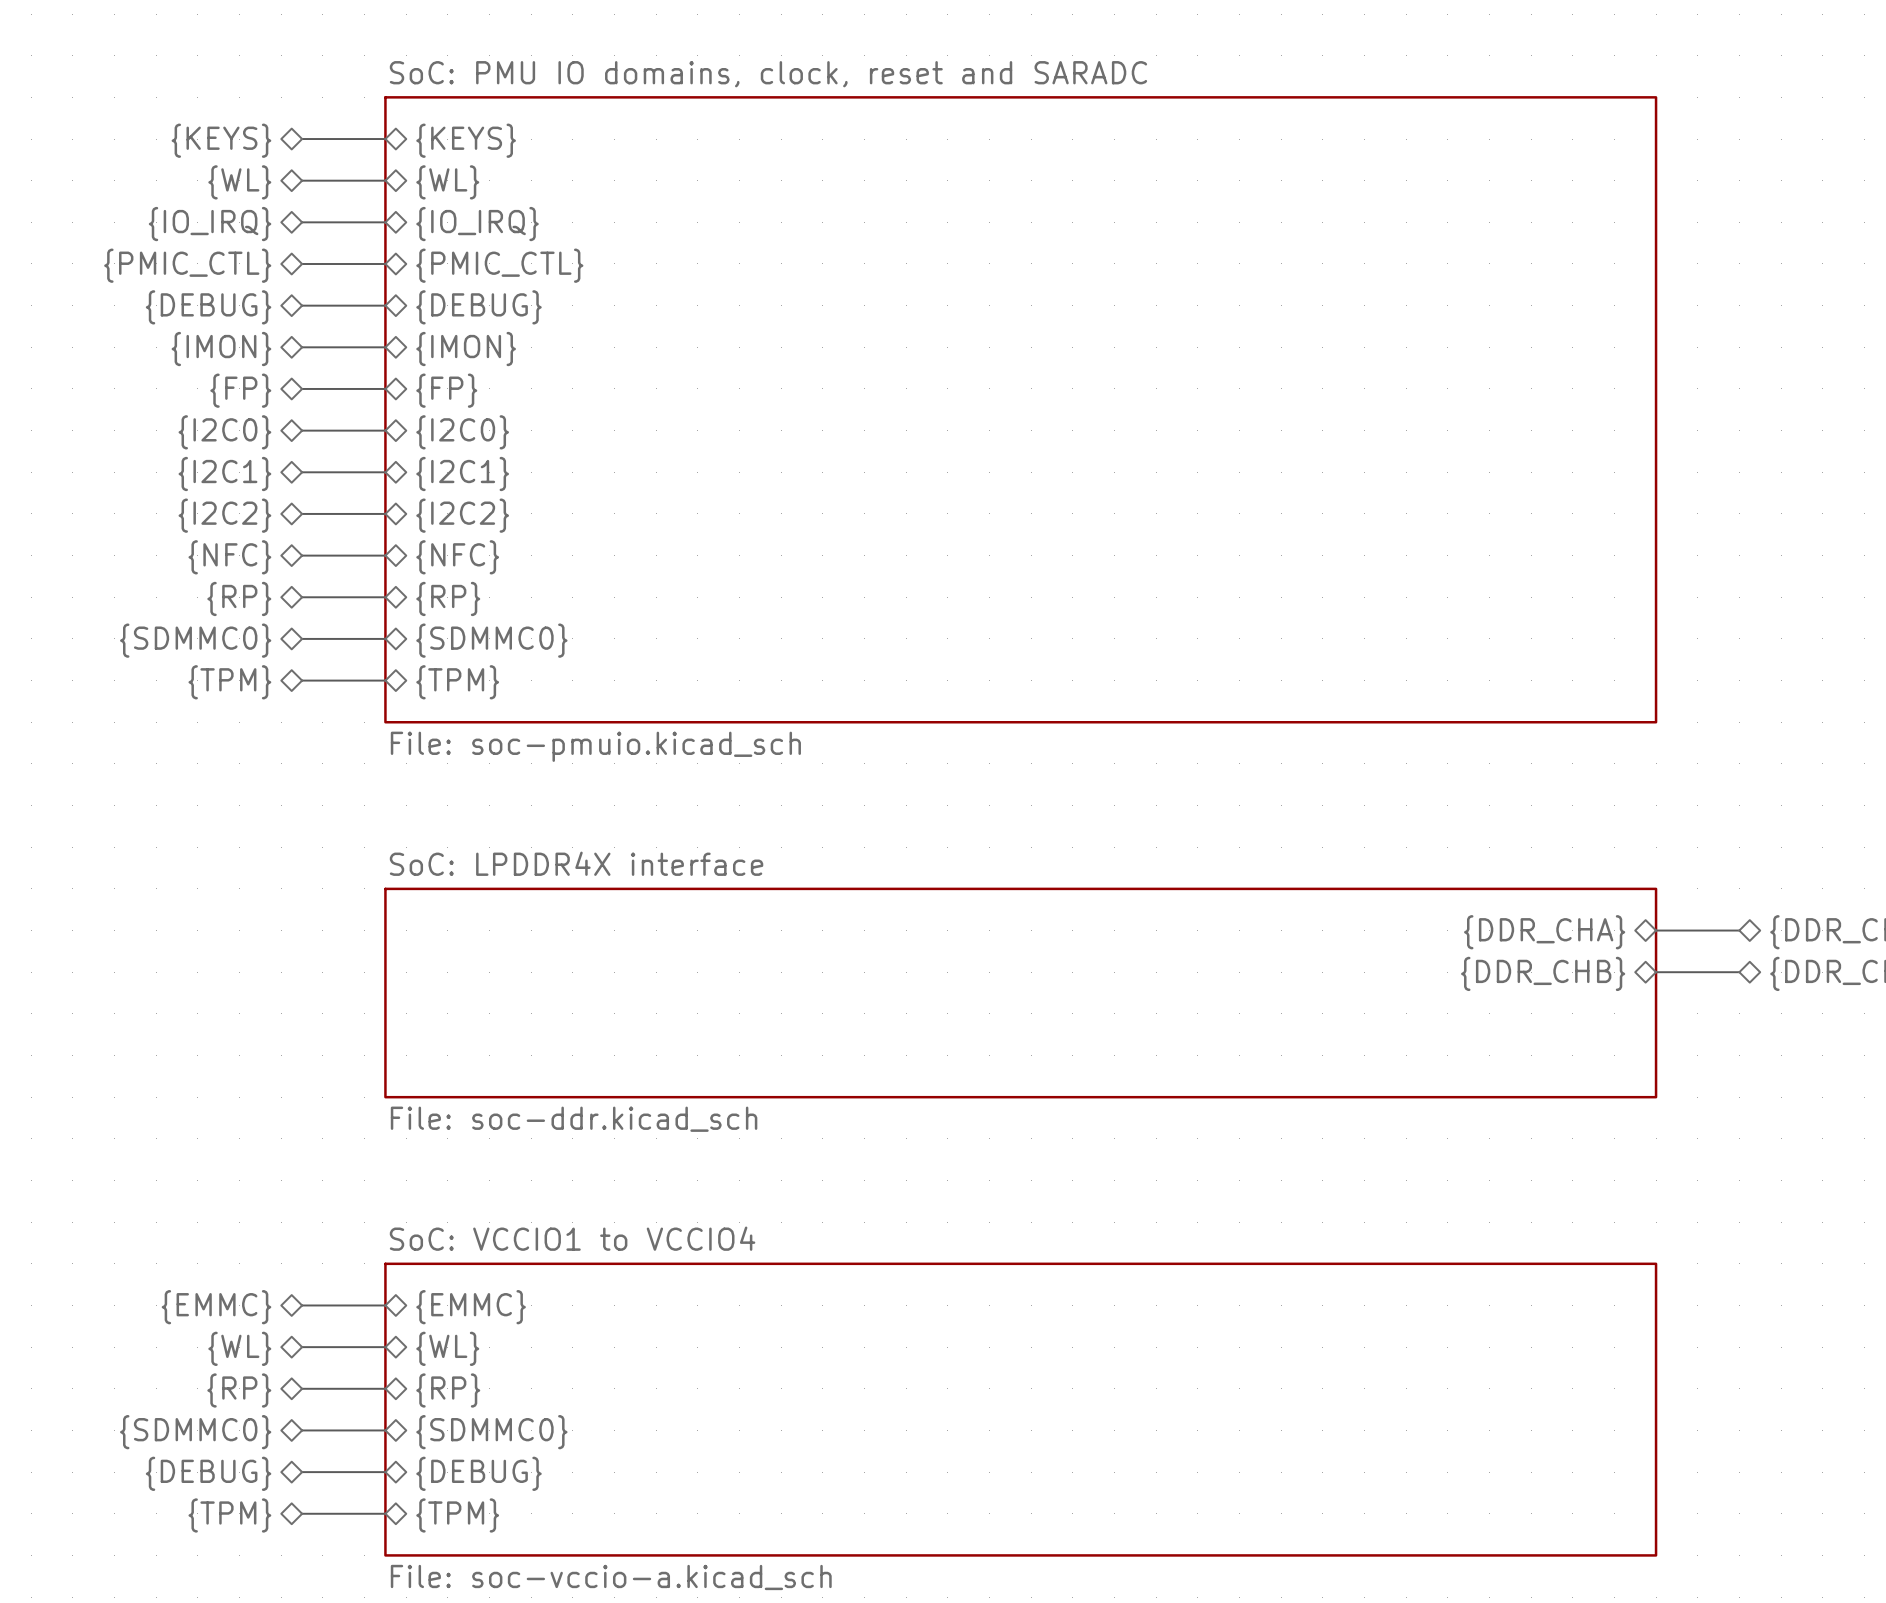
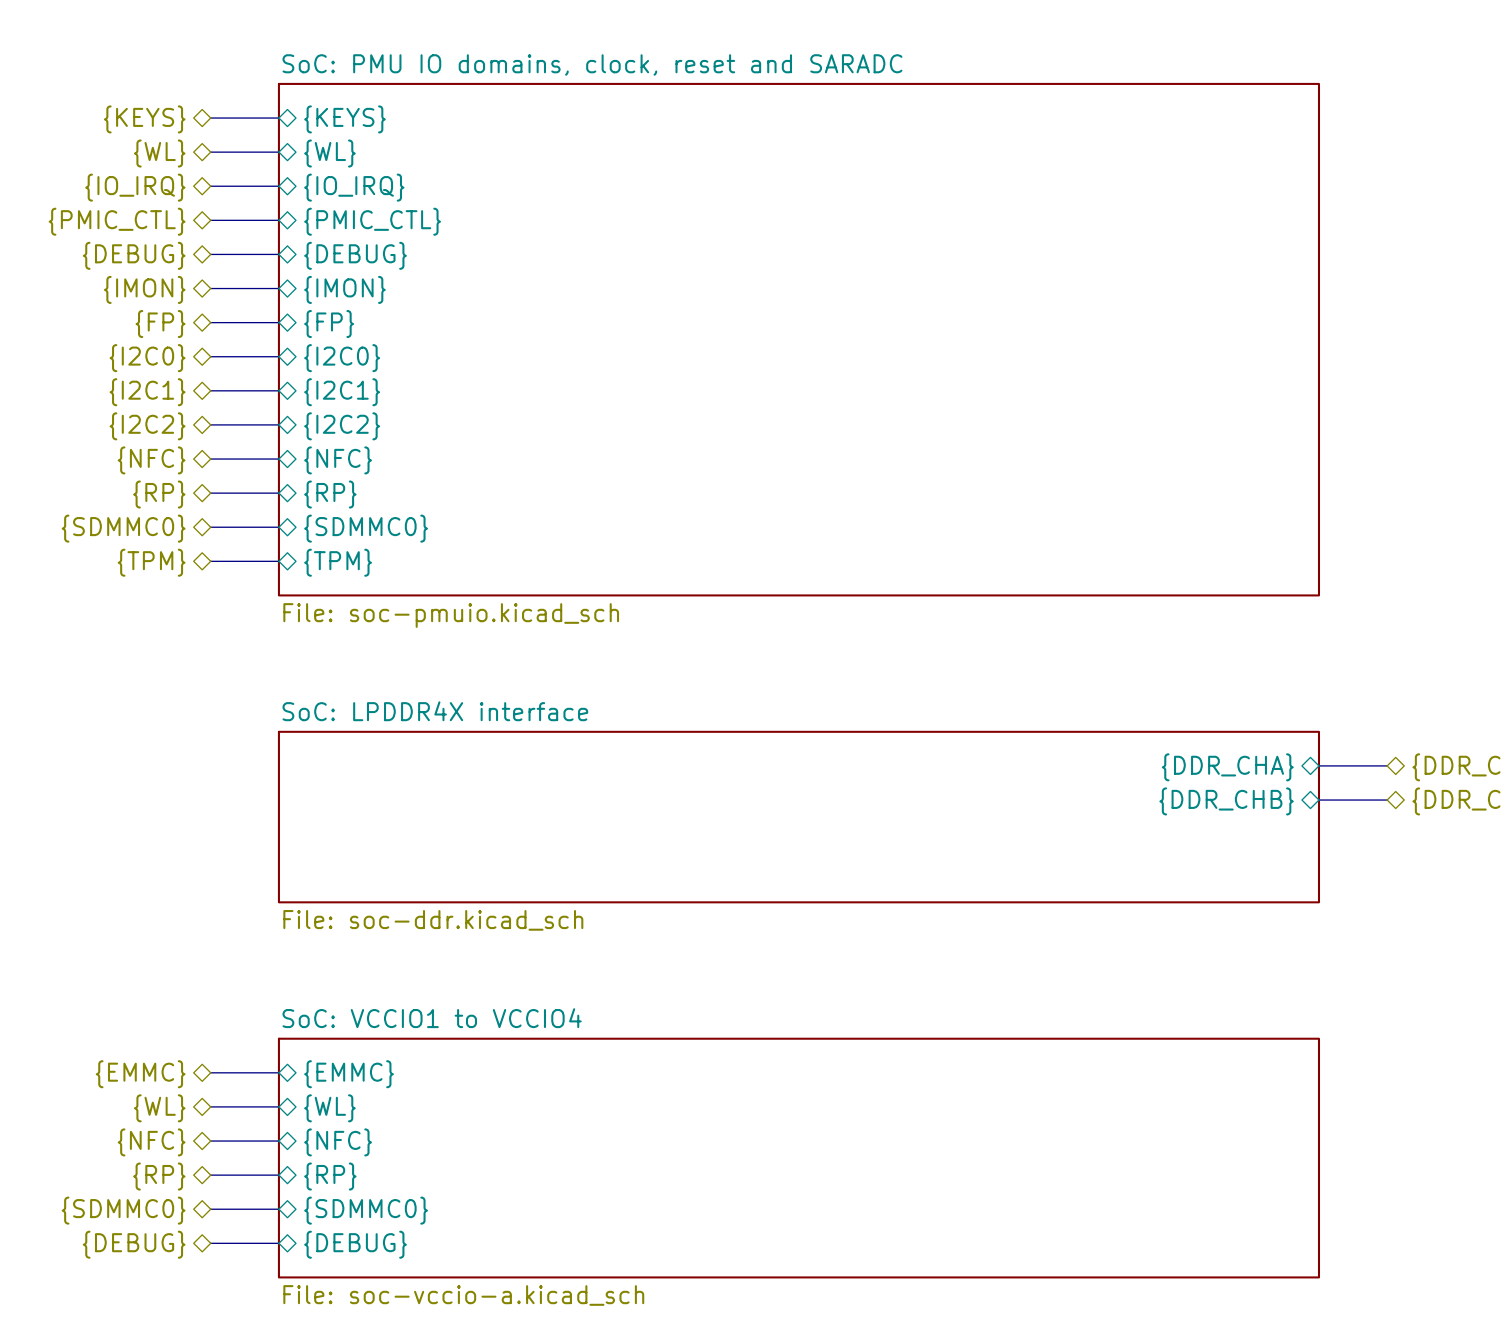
hierarchical label: {RP} (239, 1390) -> {NFC} (151, 1142)
sheet pin: {RP} (448, 1390) -> {NFC} (338, 1142)
hierarchical label: {SDMMC0} (195, 1432) -> {RP} (159, 1176)
sheet pin: {SDMMC0} (491, 1432) -> {RP} (330, 1176)
hierarchical label: {DEBUG} (208, 1473) -> {SDMMC0} (123, 1210)
sheet pin: {DEBUG} (479, 1473) -> {SDMMC0} (366, 1210)
hierarchical label: {TPM} (229, 1515) -> {DEBUG} (134, 1244)
sheet pin: {TPM} (457, 1515) -> {DEBUG} (355, 1244)

